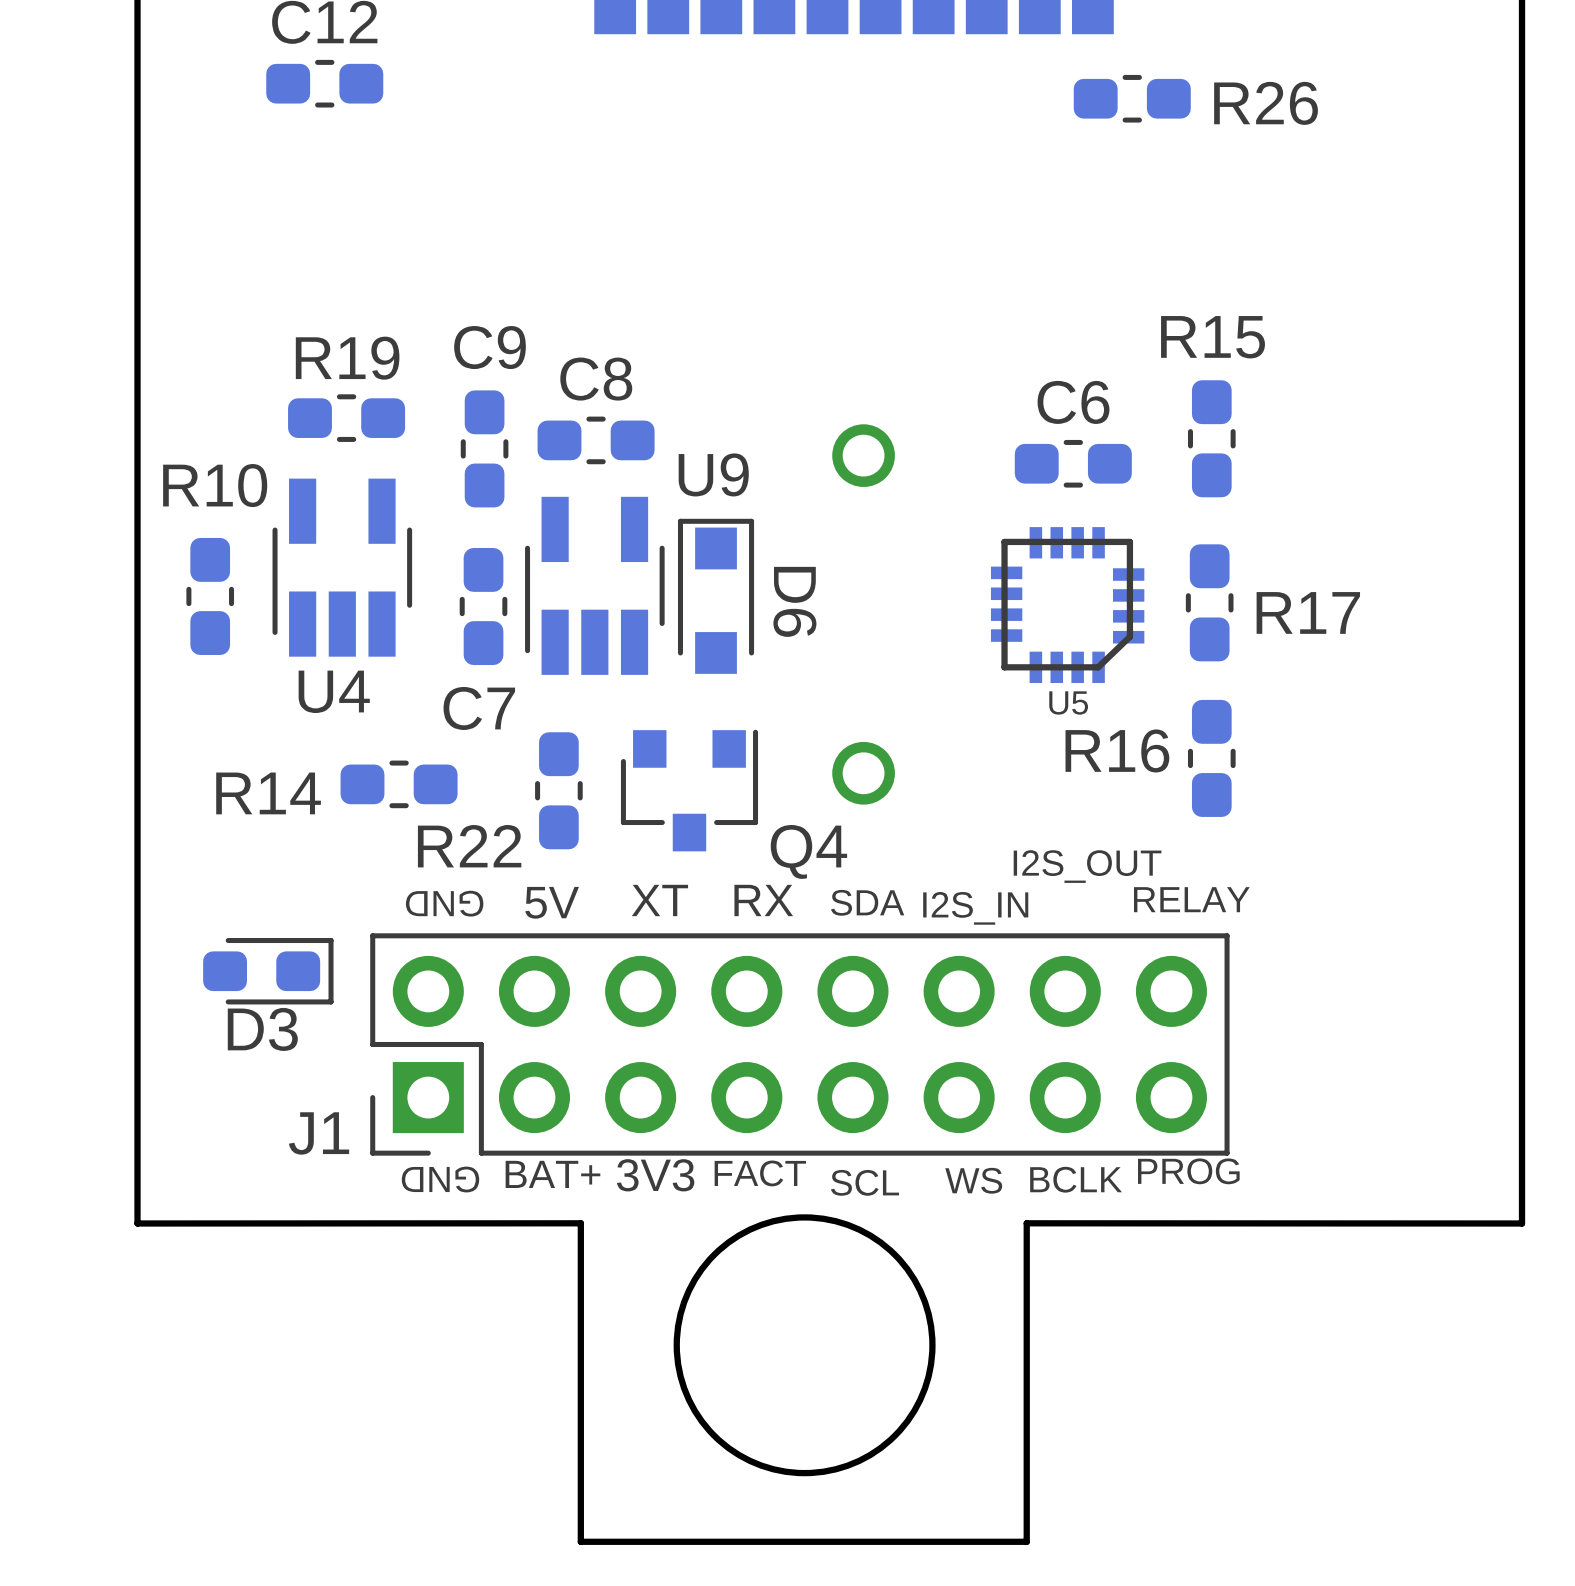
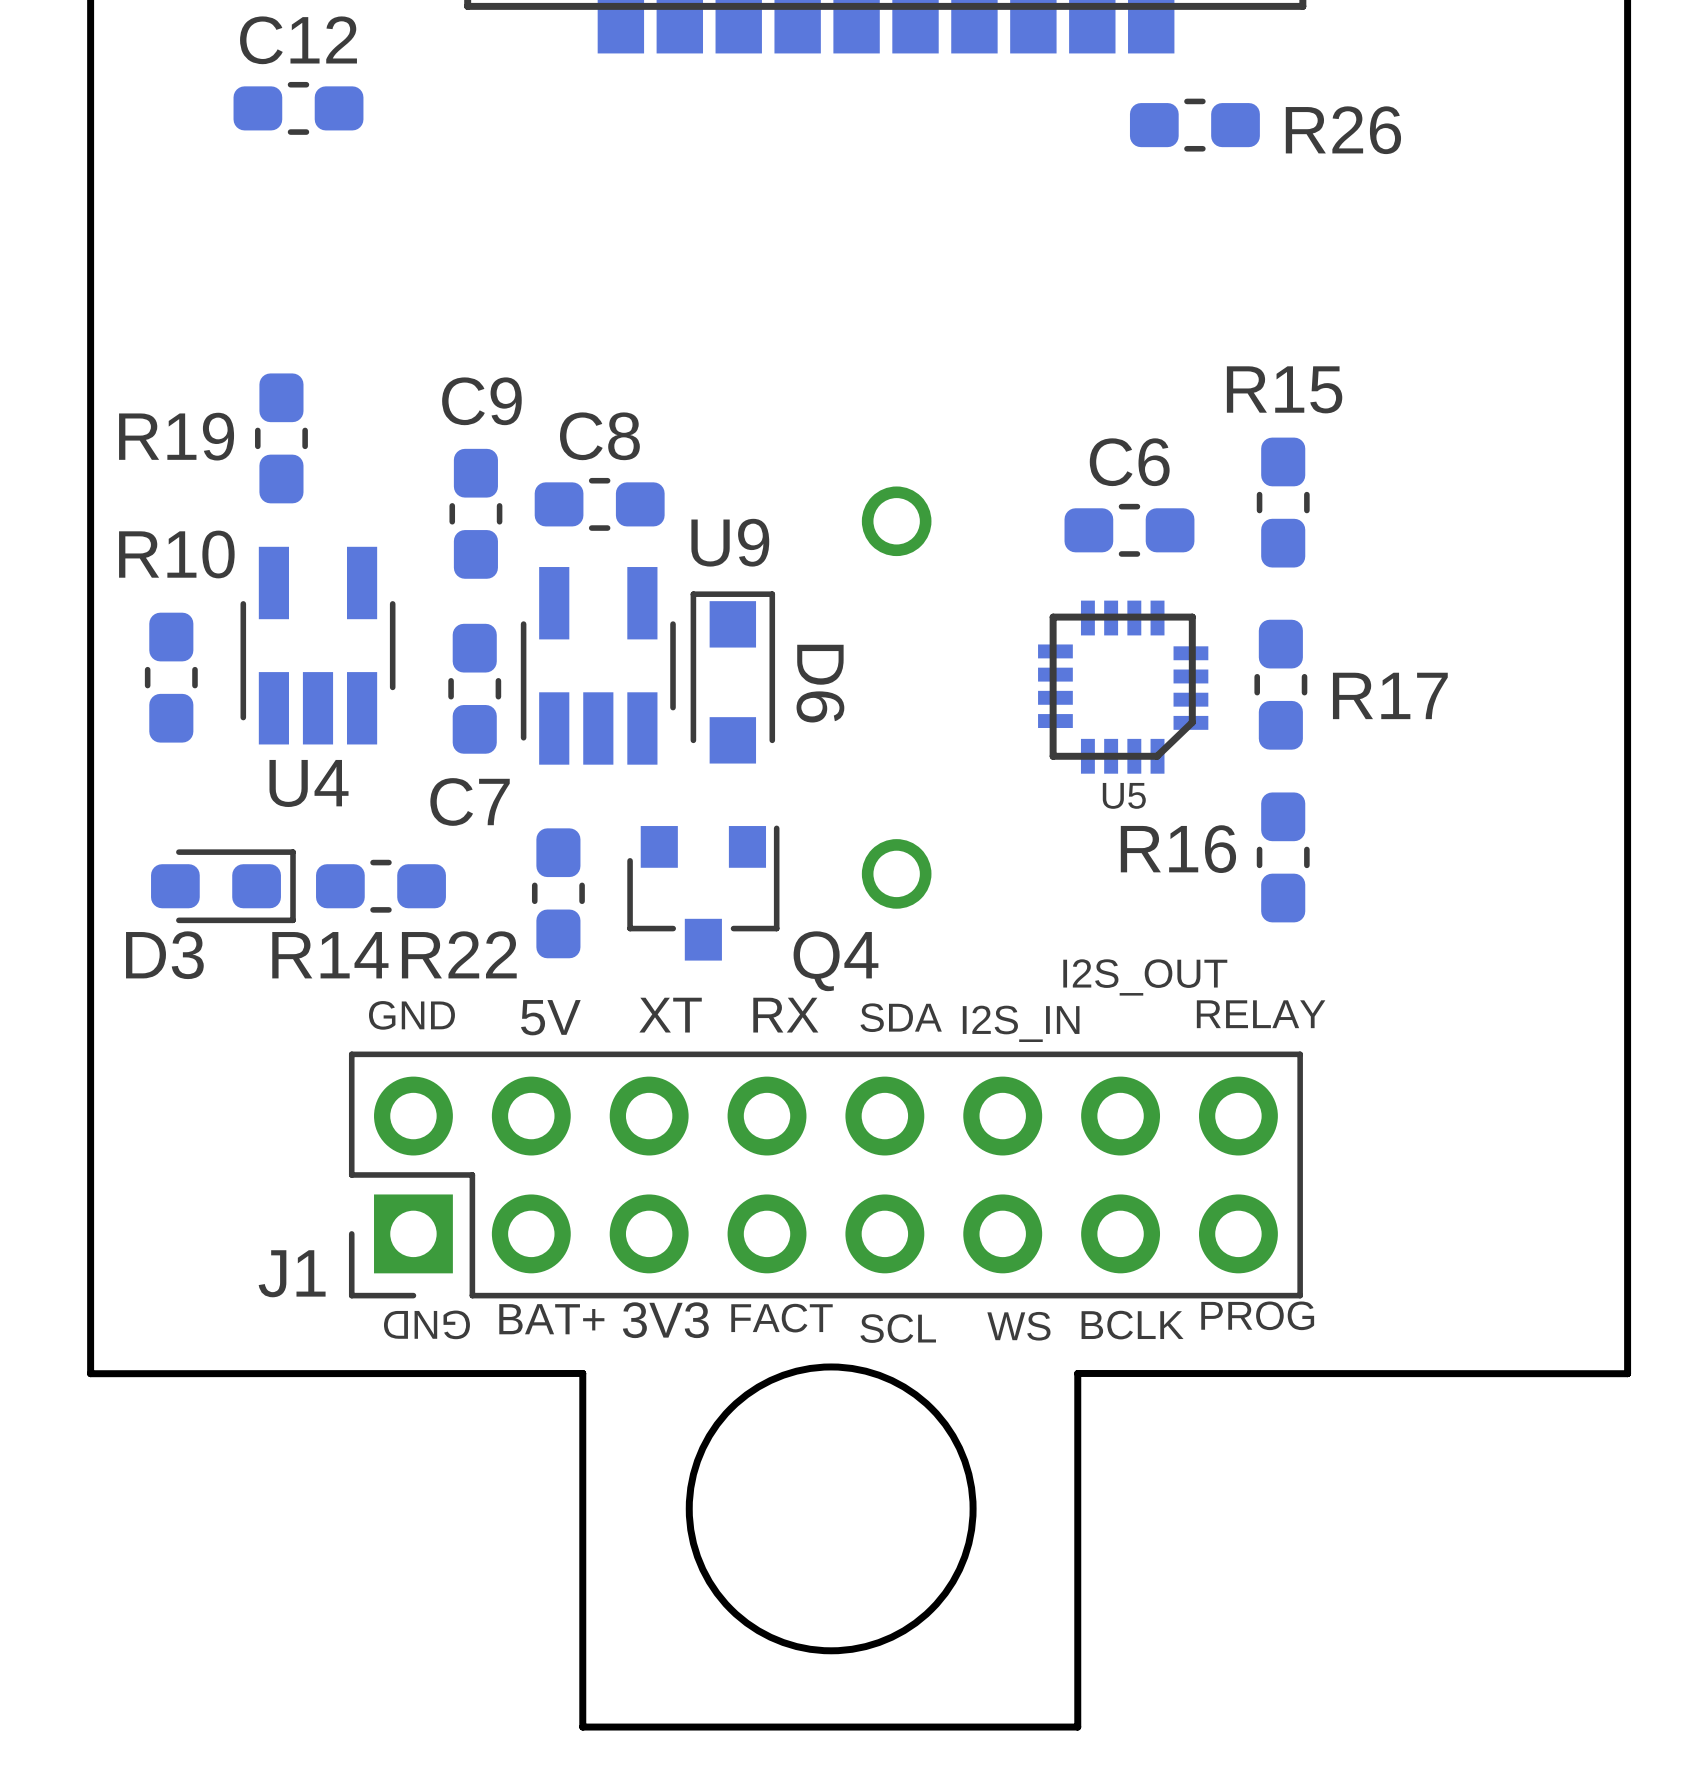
R19 name position: R19 (347, 358) -> R19 (176, 436)
R19 rotation: 0° (346, 418) -> 90° clockwise (281, 438)
R14 name position: R14 (268, 793) -> R14 (330, 955)
text rotation: 0° (444, 903) -> 180° (411, 1015)
D3 position: (268, 971) -> (223, 886)
D3 name position: D3 (262, 1029) -> D3 (164, 955)

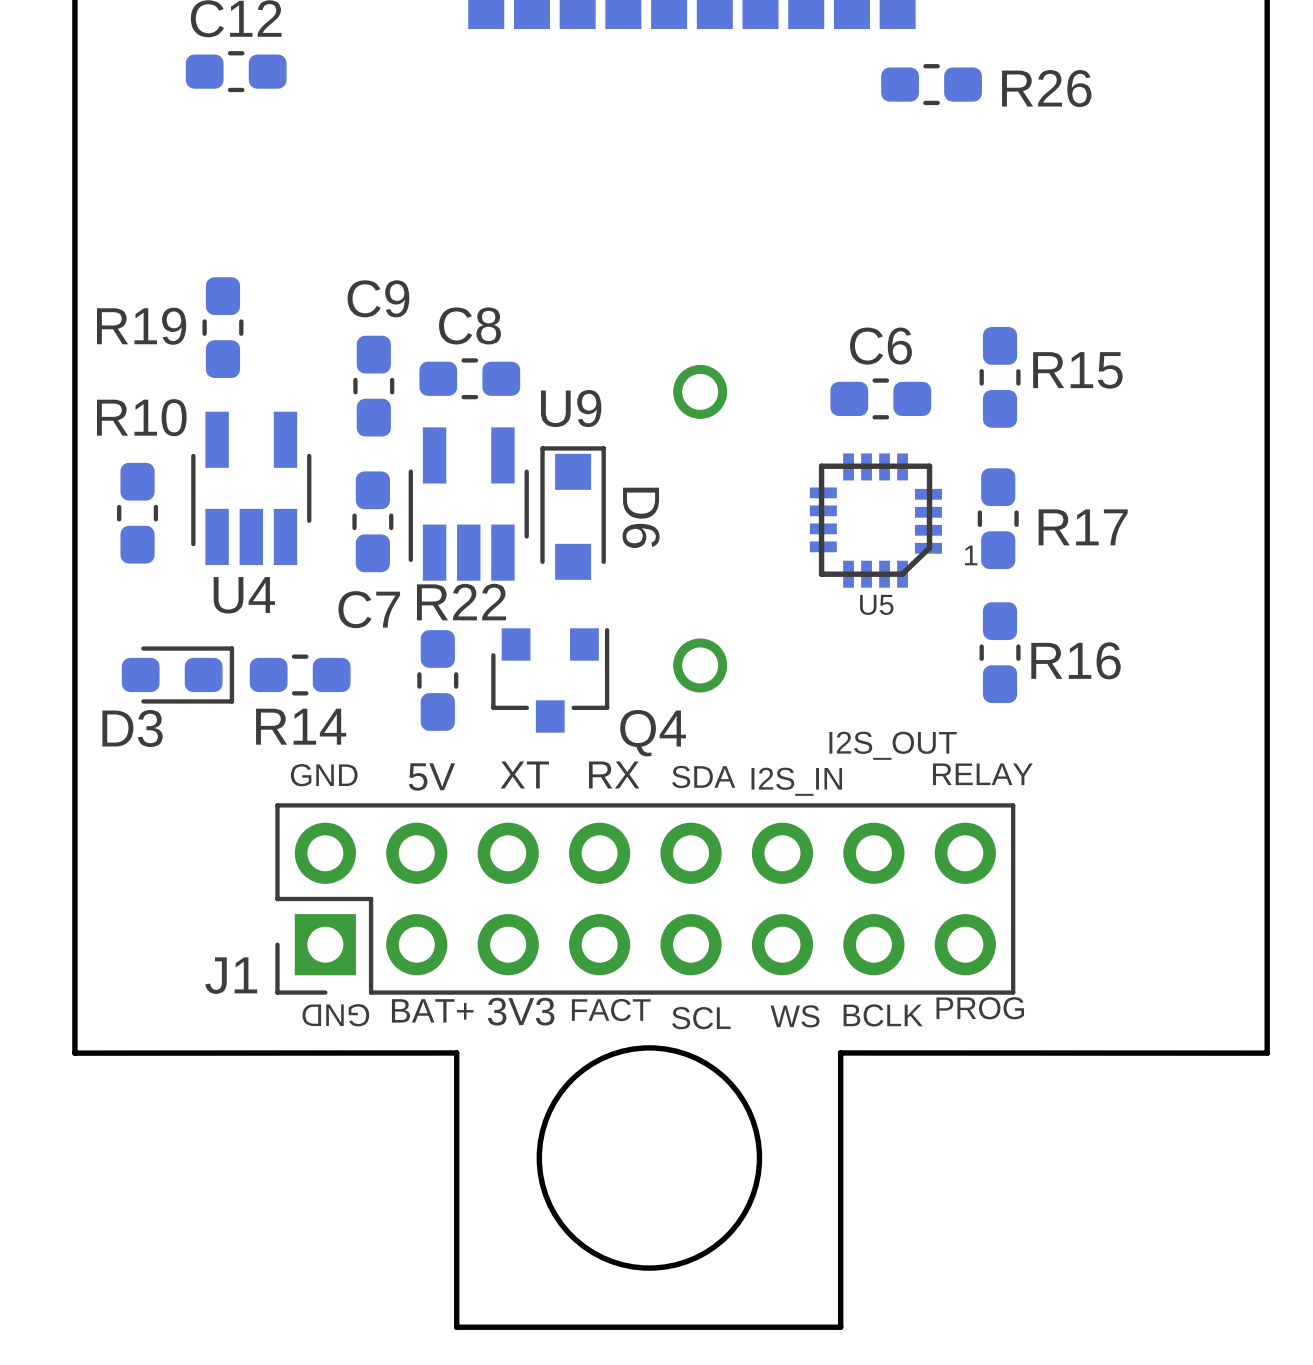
R15 name position: R15 (1284, 389) -> R15 (1077, 370)
text: none -> 1 (971, 555)
R16 name position: R16 (1178, 849) -> R16 (1076, 660)
R22 name position: R22 (459, 954) -> R22 (461, 602)
R14 name position: R14 (330, 955) -> R14 (301, 726)

